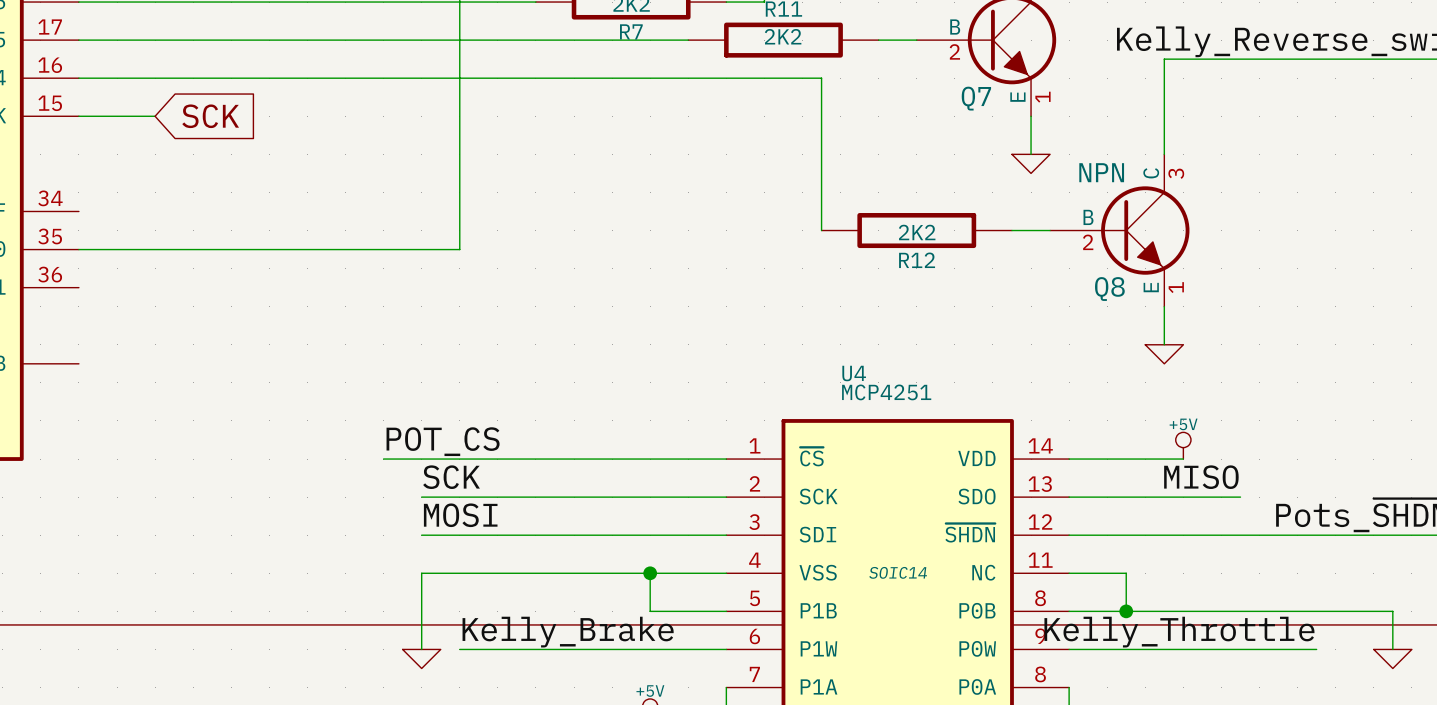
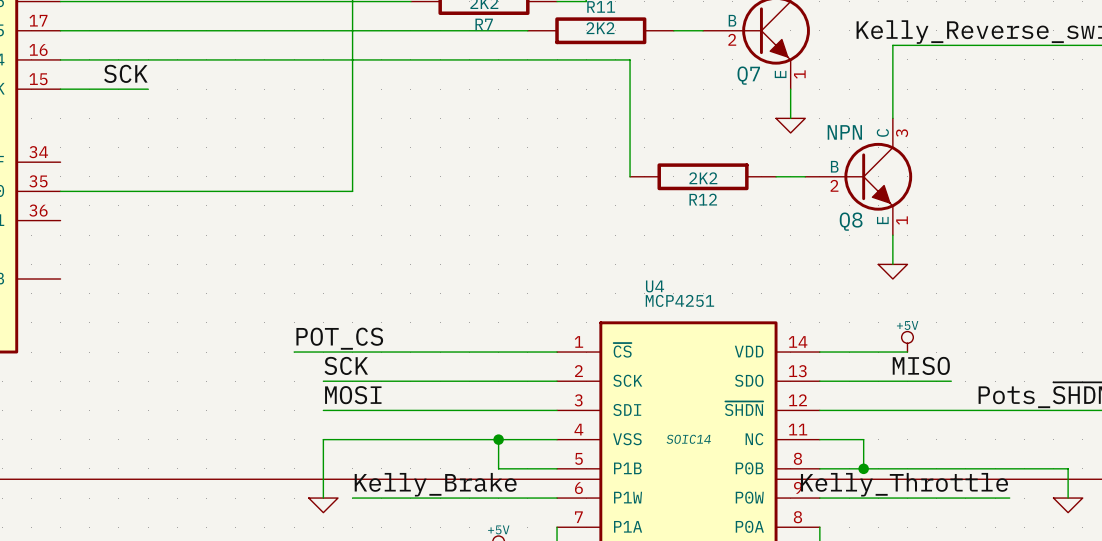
label: none -> SCK (125, 73)
wire: none -> (118, 89) (148, 89)
global label: SCK (210, 116) -> none

